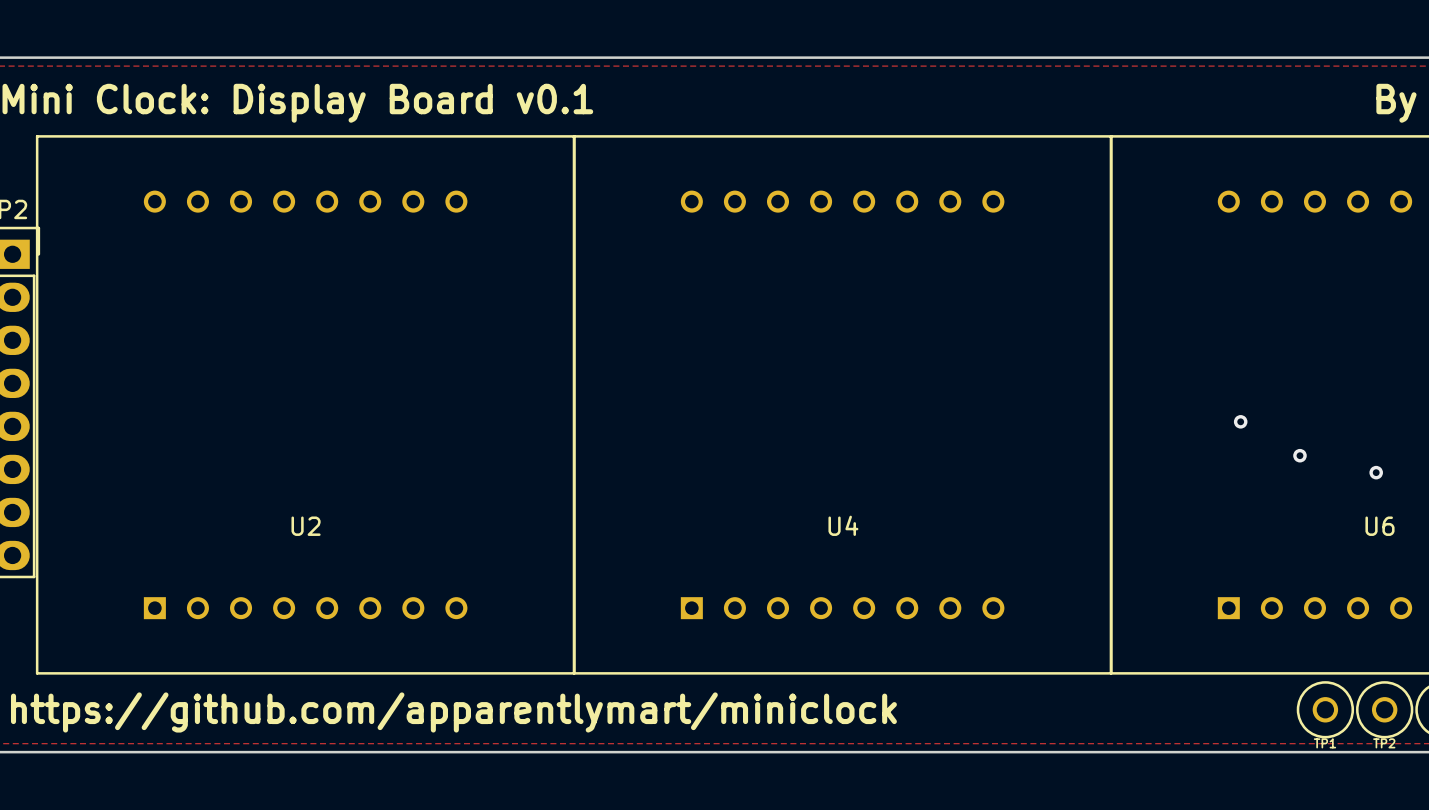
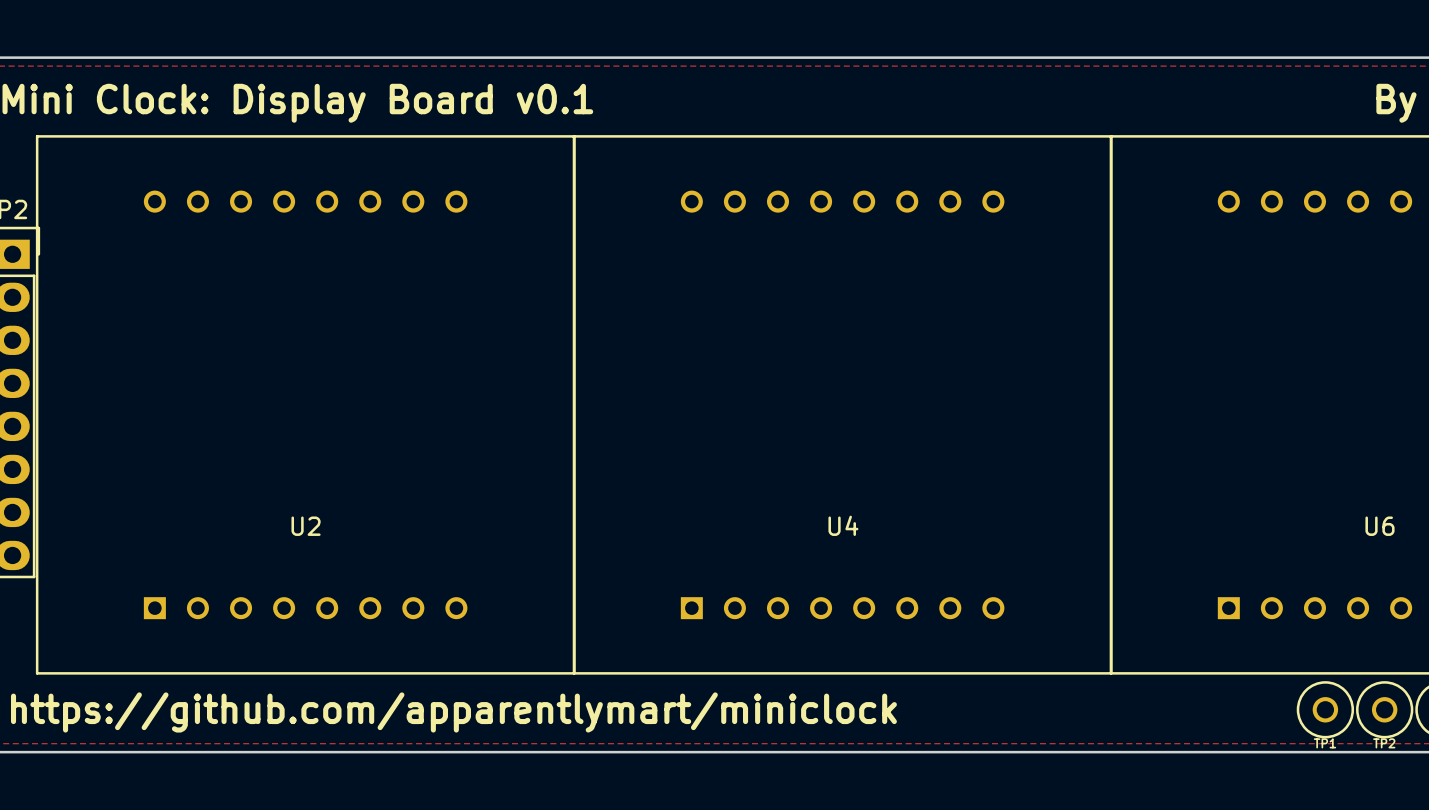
via: (1240, 421) -> none
via: (1299, 455) -> none
via: (1376, 472) -> none

